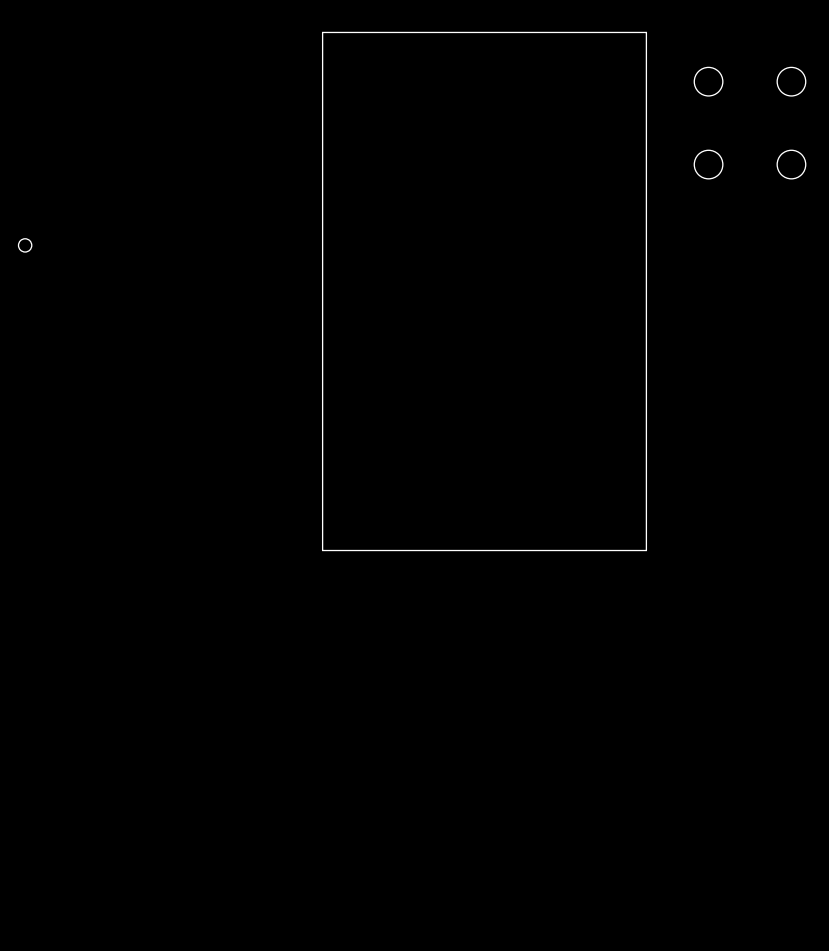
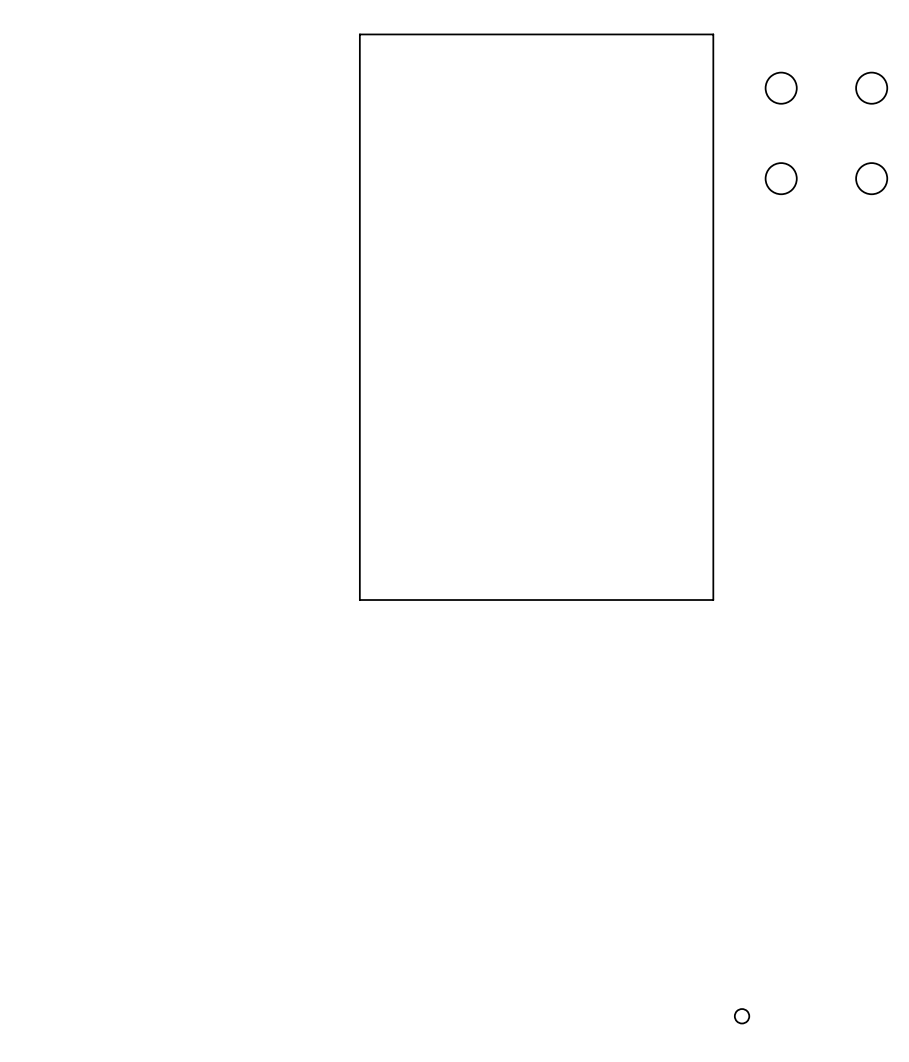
part: (25, 245) -> none
part: none -> (742, 1016)

